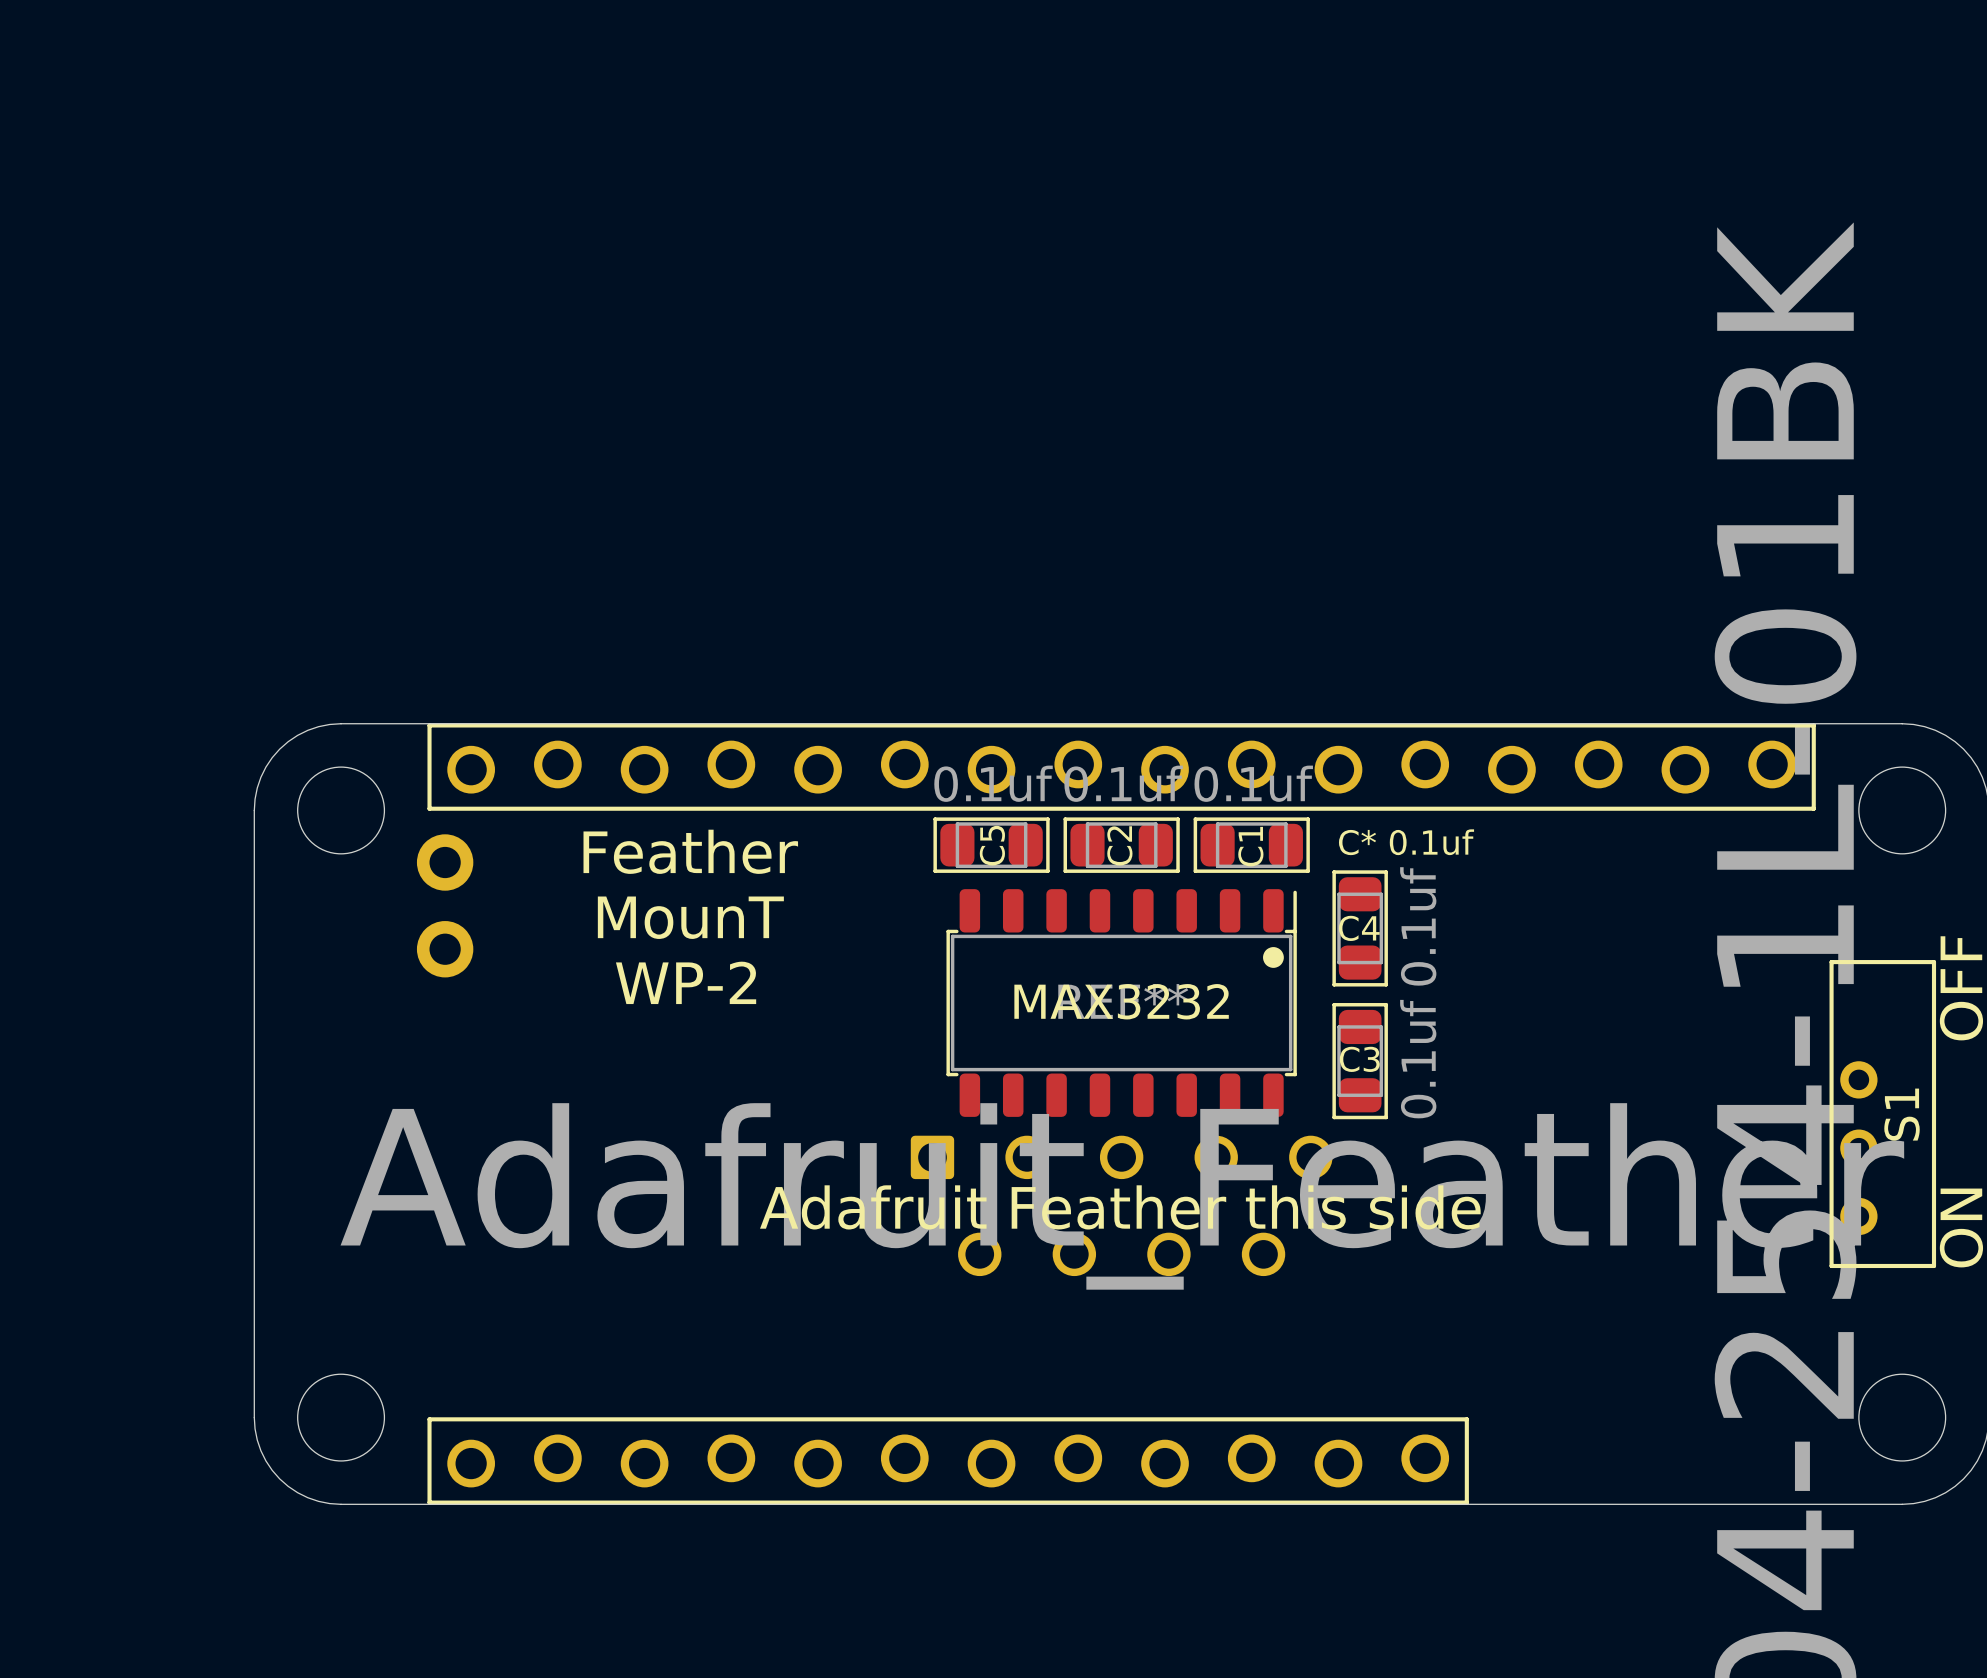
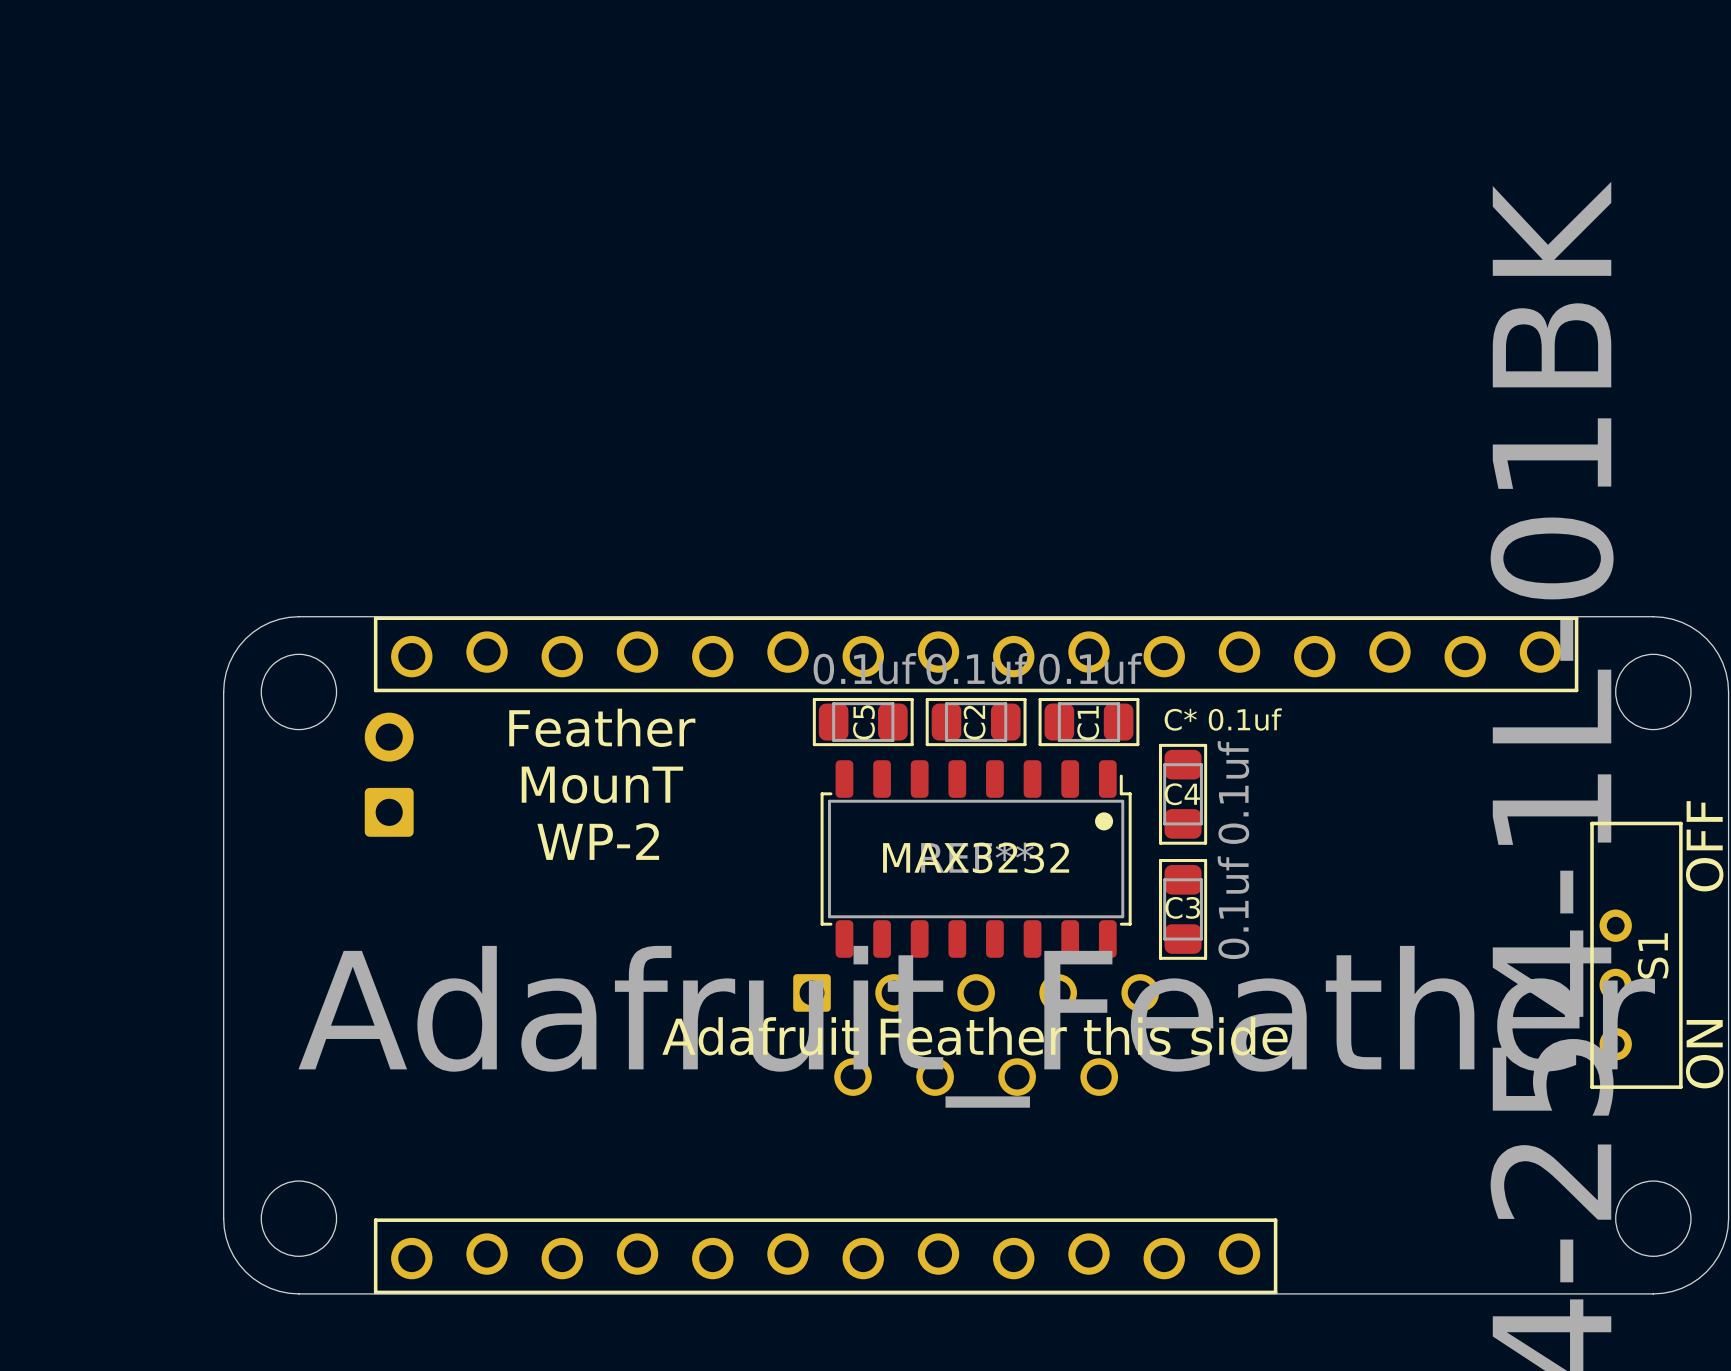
part footprint: [416, 834, 474, 978] -> [364, 712, 414, 837]
part footprint: [946, 889, 1297, 1117] -> [820, 760, 1132, 958]

